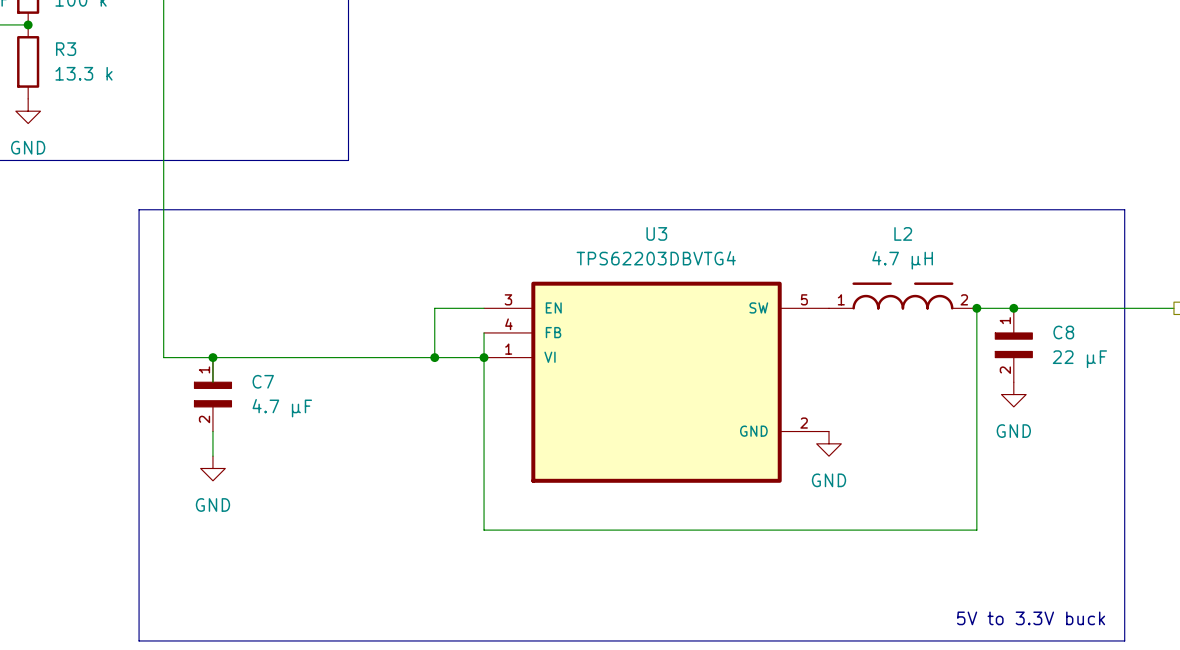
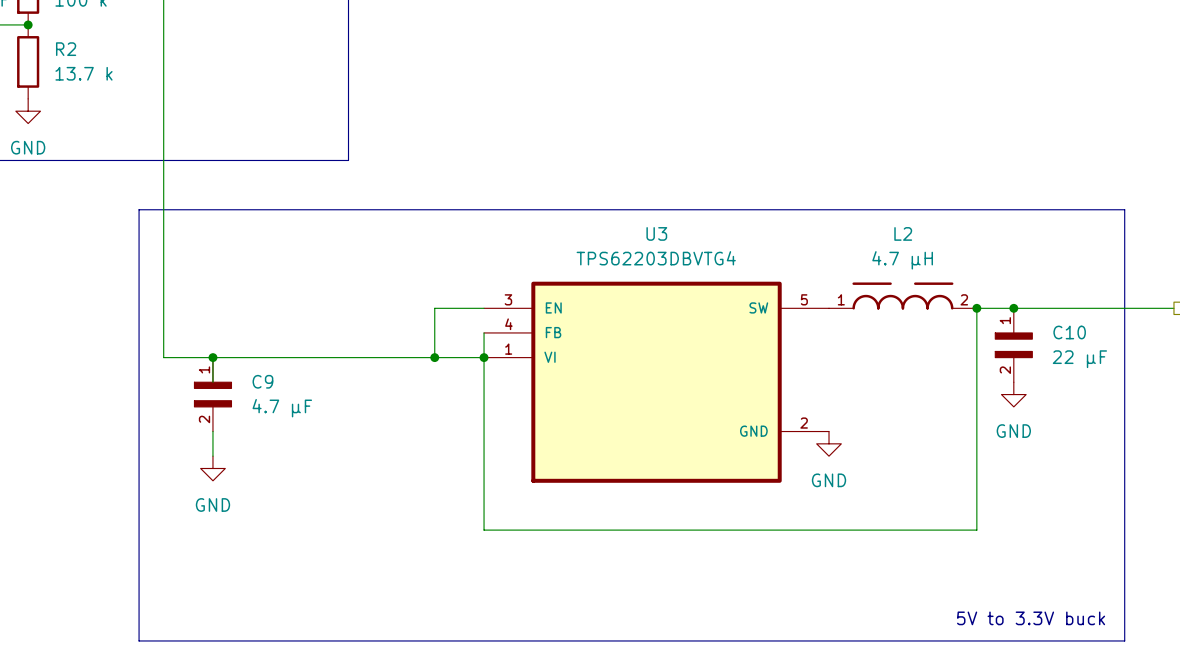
R3 name: R3 (66, 49) -> R2 (66, 49)
R3 value: 13.3 k (83, 73) -> 13.7 k (83, 73)
C8 name: C8 (1063, 332) -> C10 (1069, 332)
C7 name: C7 (263, 381) -> C9 (262, 381)

